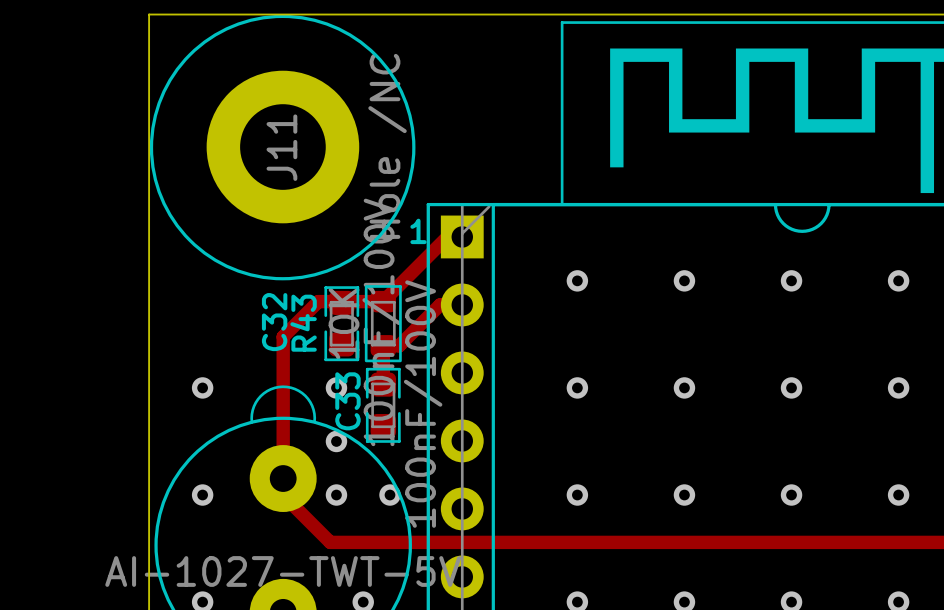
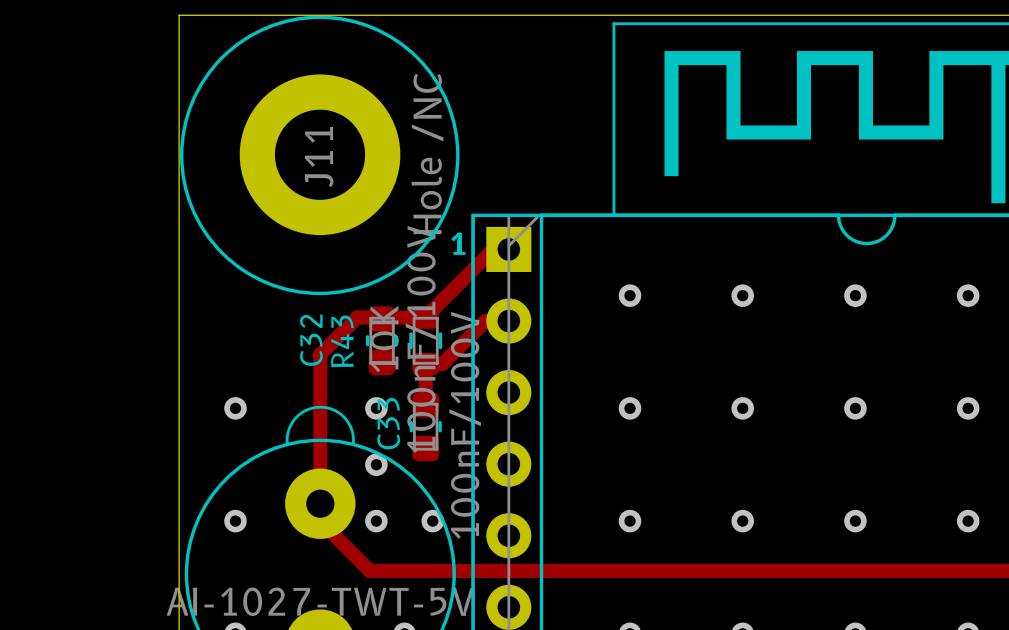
R43 footprint: [364, 285, 402, 363] -> [409, 306, 443, 376]
C32 footprint: [324, 286, 360, 362] -> [365, 306, 399, 376]
C33 footprint: [365, 367, 401, 443] -> [409, 392, 442, 462]

